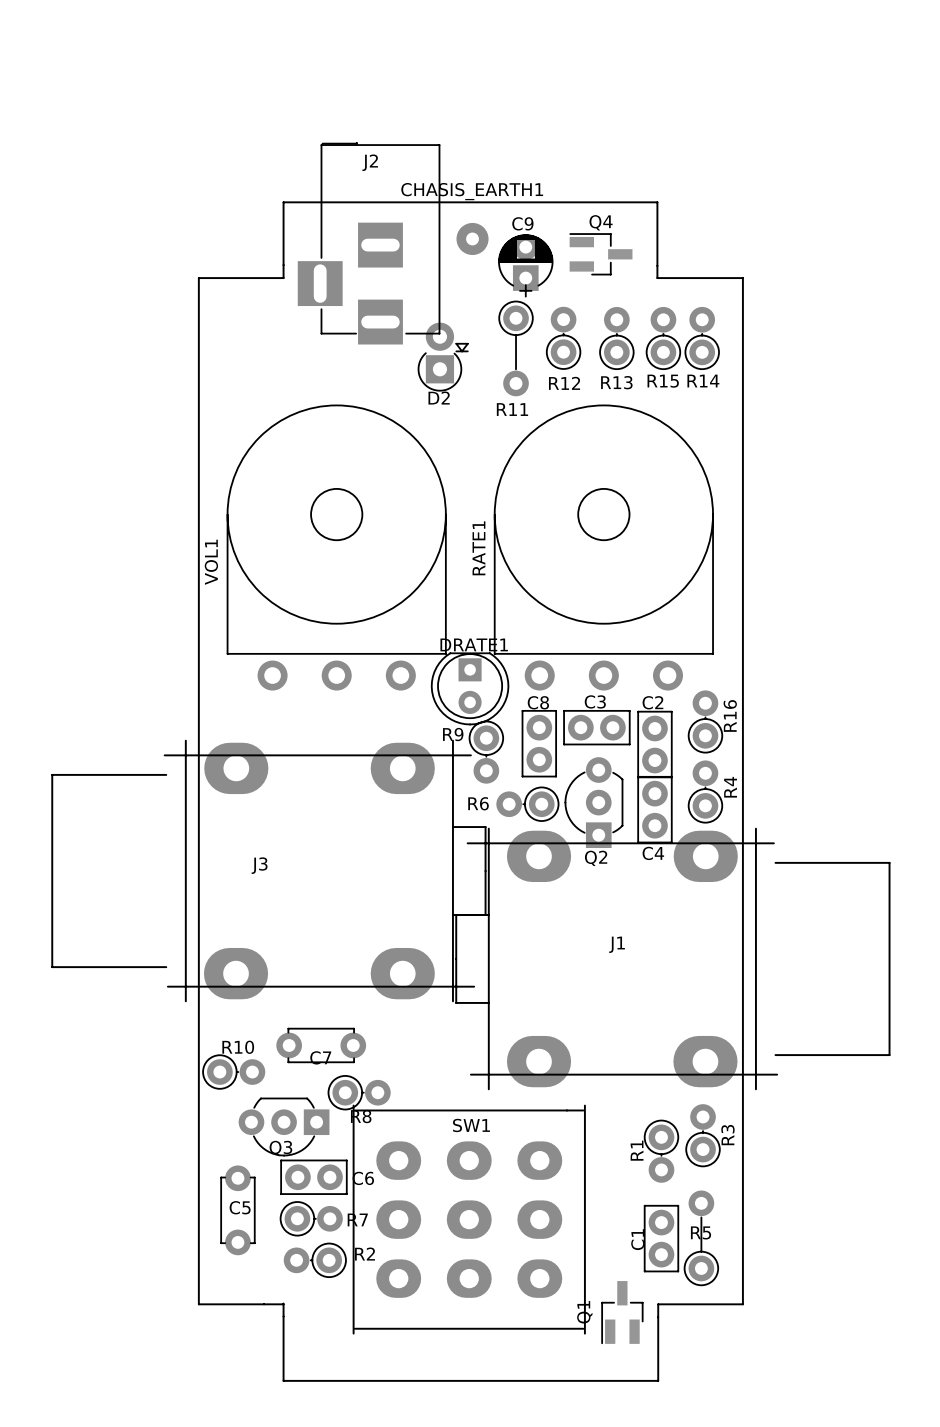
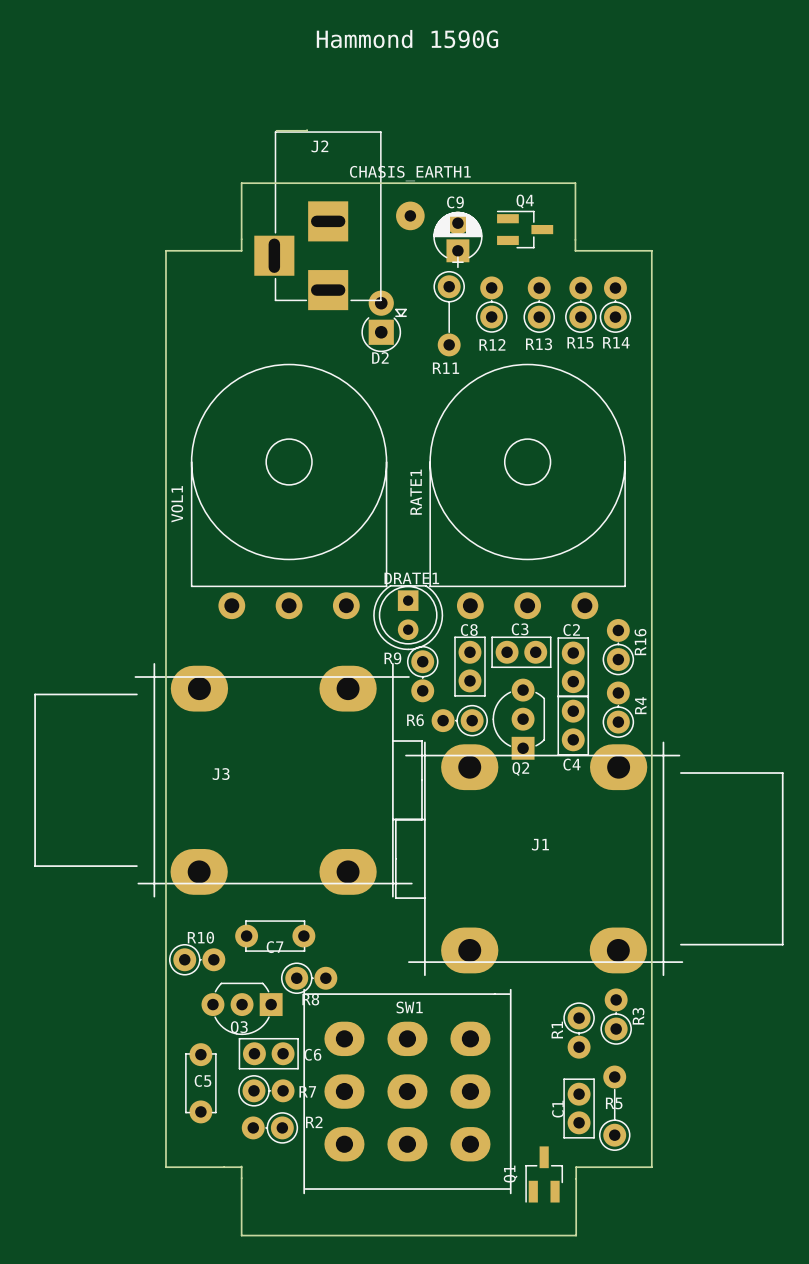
text: none -> Hammond 1590G (407, 39)

